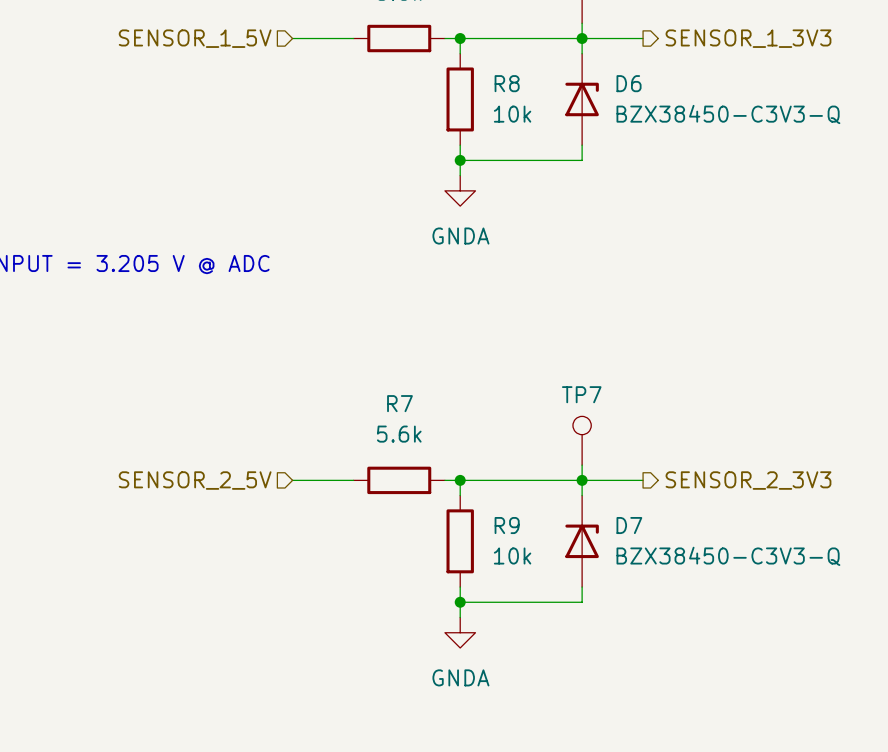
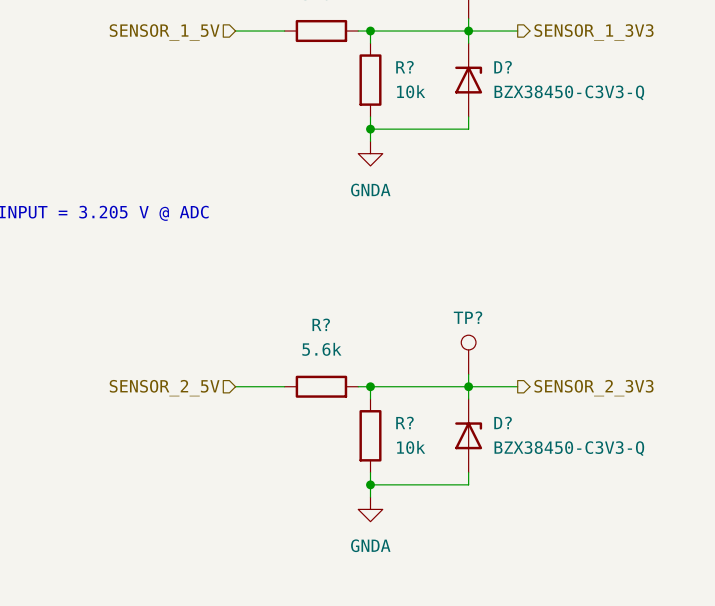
R8 name: R8 (507, 83) -> R? (404, 67)
D6 name: D6 (629, 83) -> D? (503, 67)
TP7 name: TP7 (581, 394) -> TP? (468, 317)
R7 name: R7 (399, 403) -> R? (321, 324)
R9 name: R9 (507, 525) -> R? (404, 422)
D7 name: D7 (629, 525) -> D? (503, 422)

